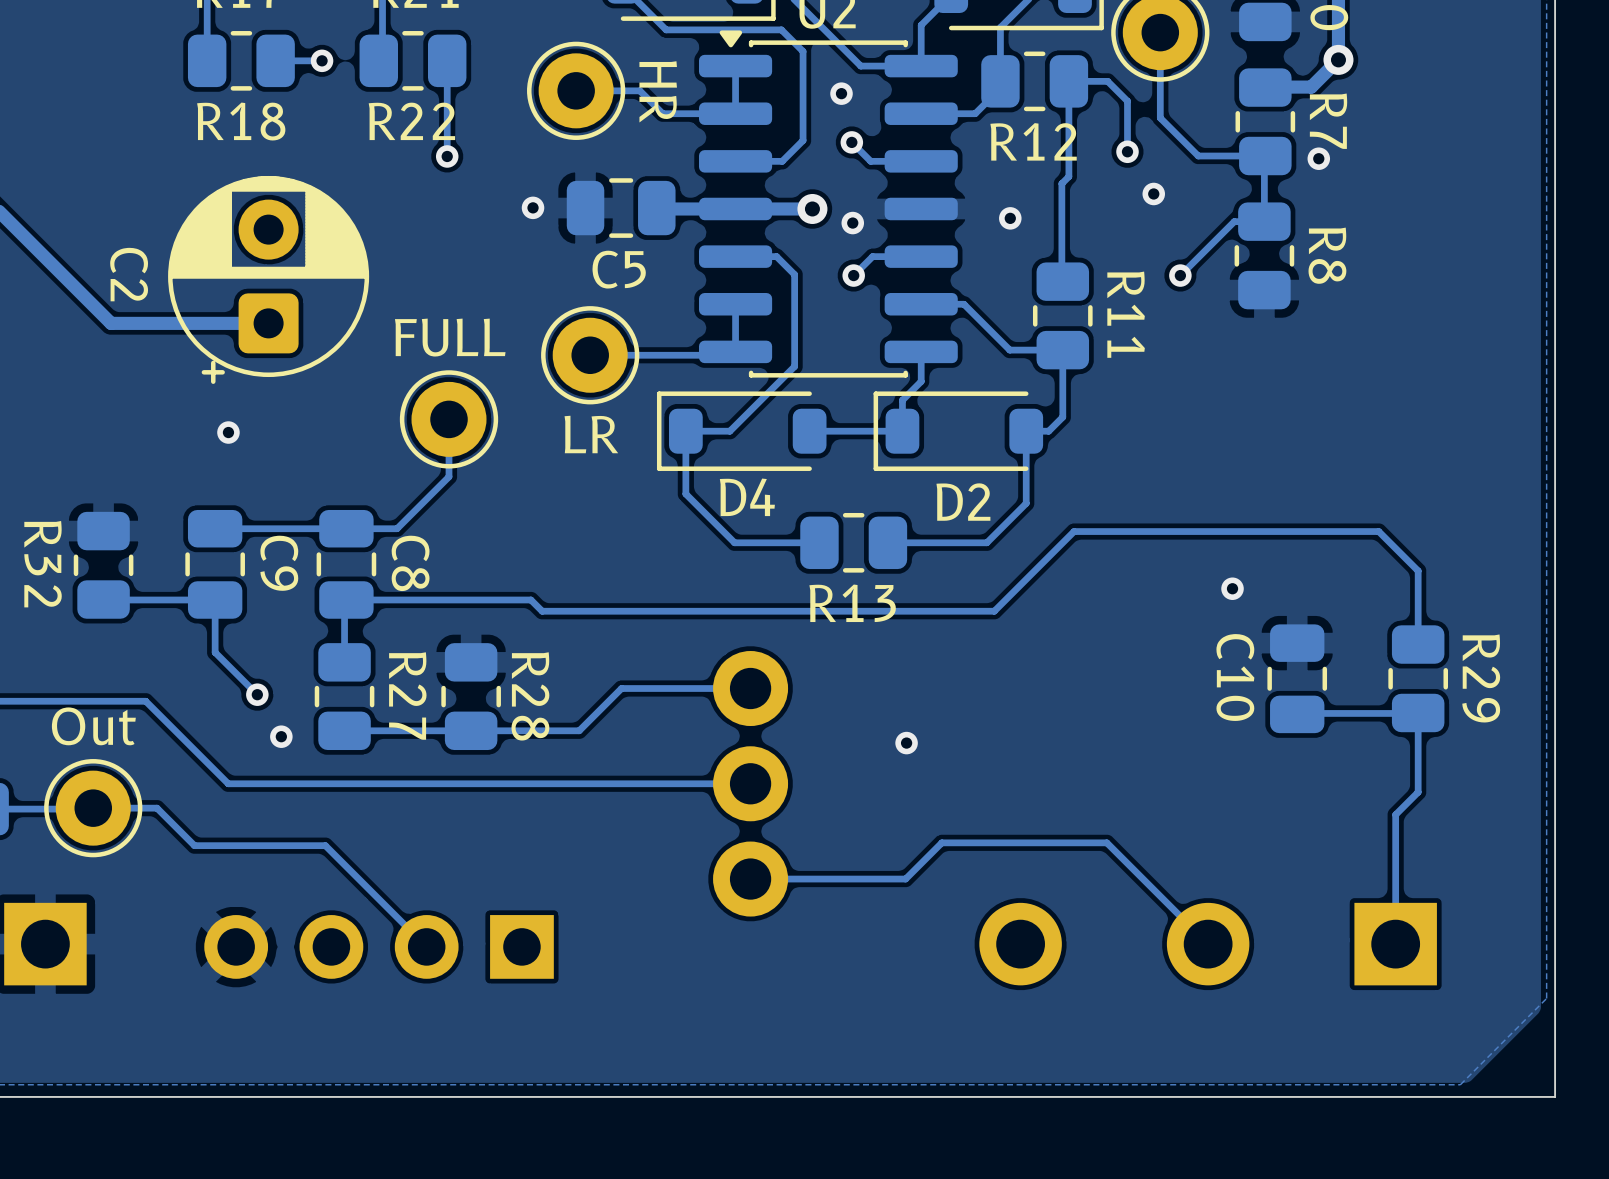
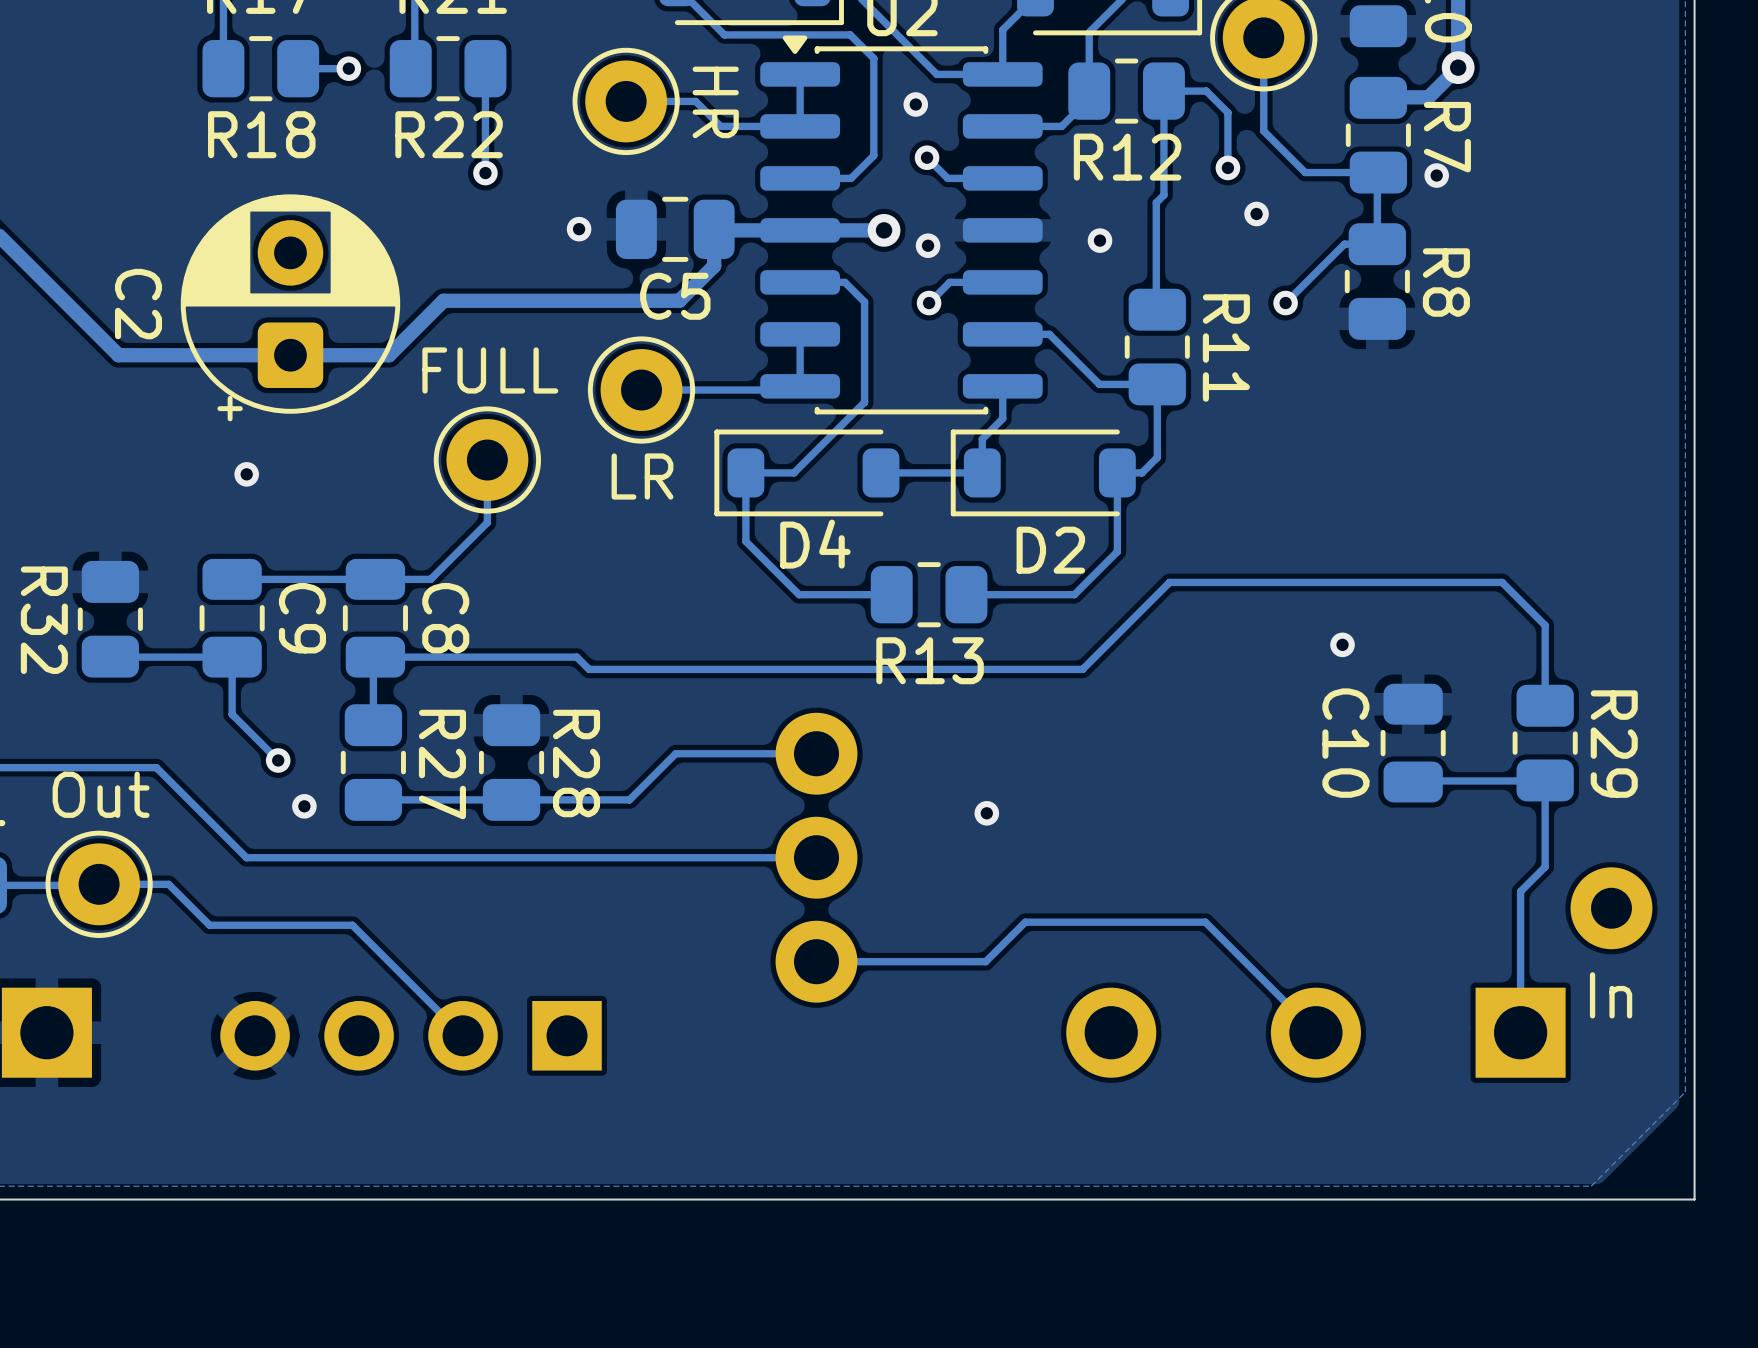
track: none -> (714, 229) (714, 265) (679, 300) (443, 300) (389, 355) (290, 355)
part: none -> In (1611, 908)

